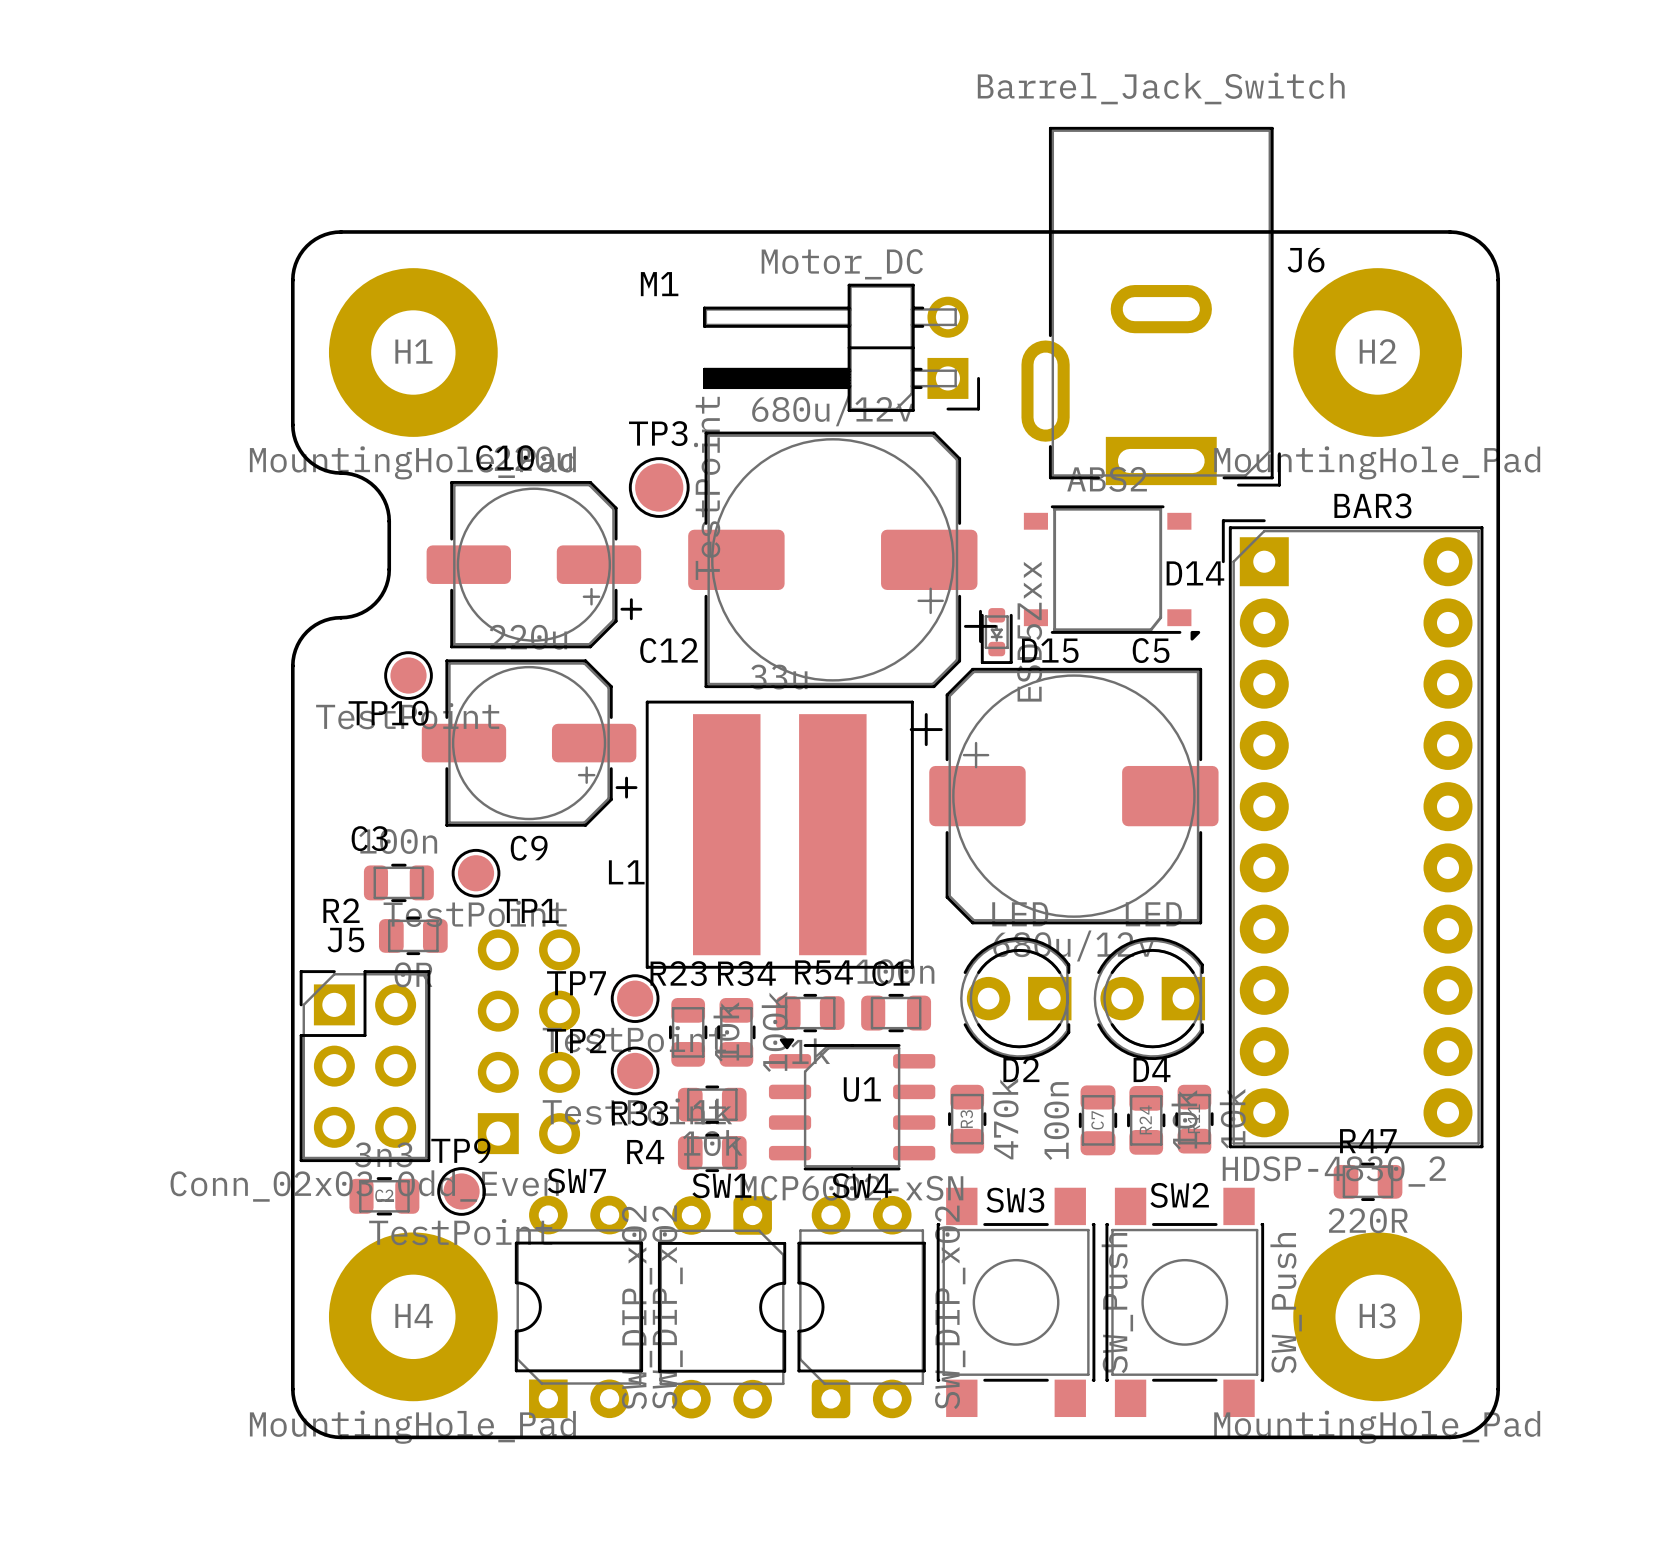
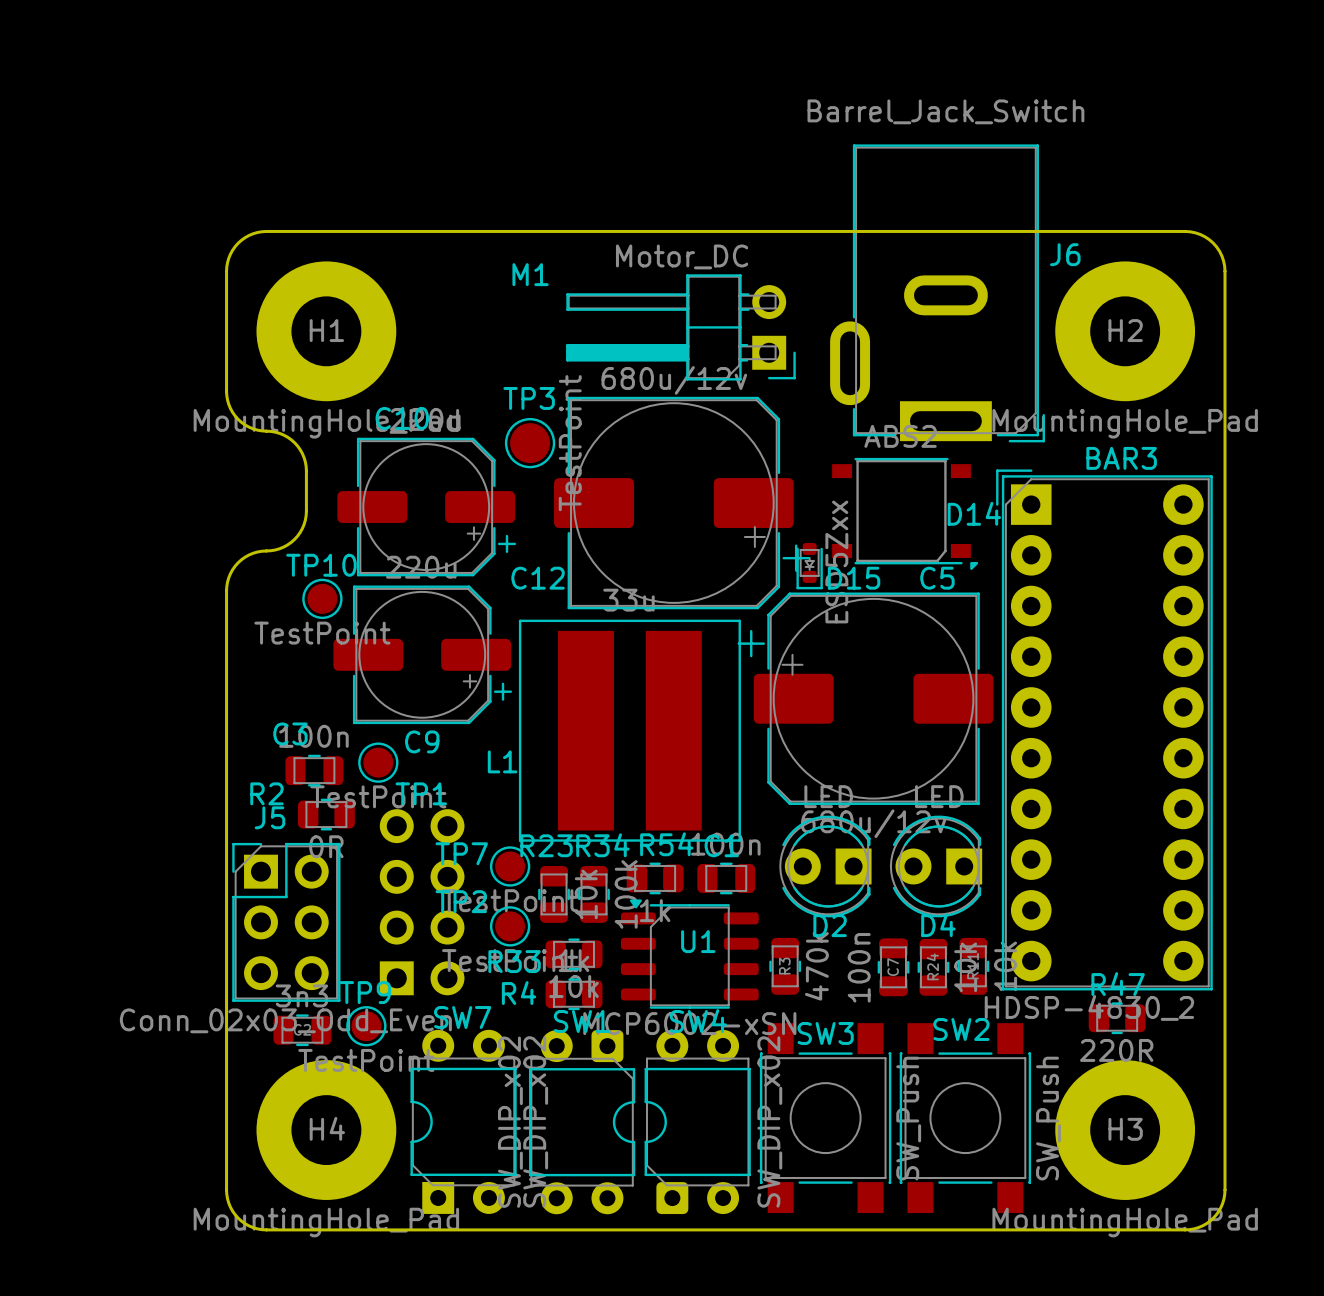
TP10 name position: TP10 (388, 713) -> TP10 (321, 565)

